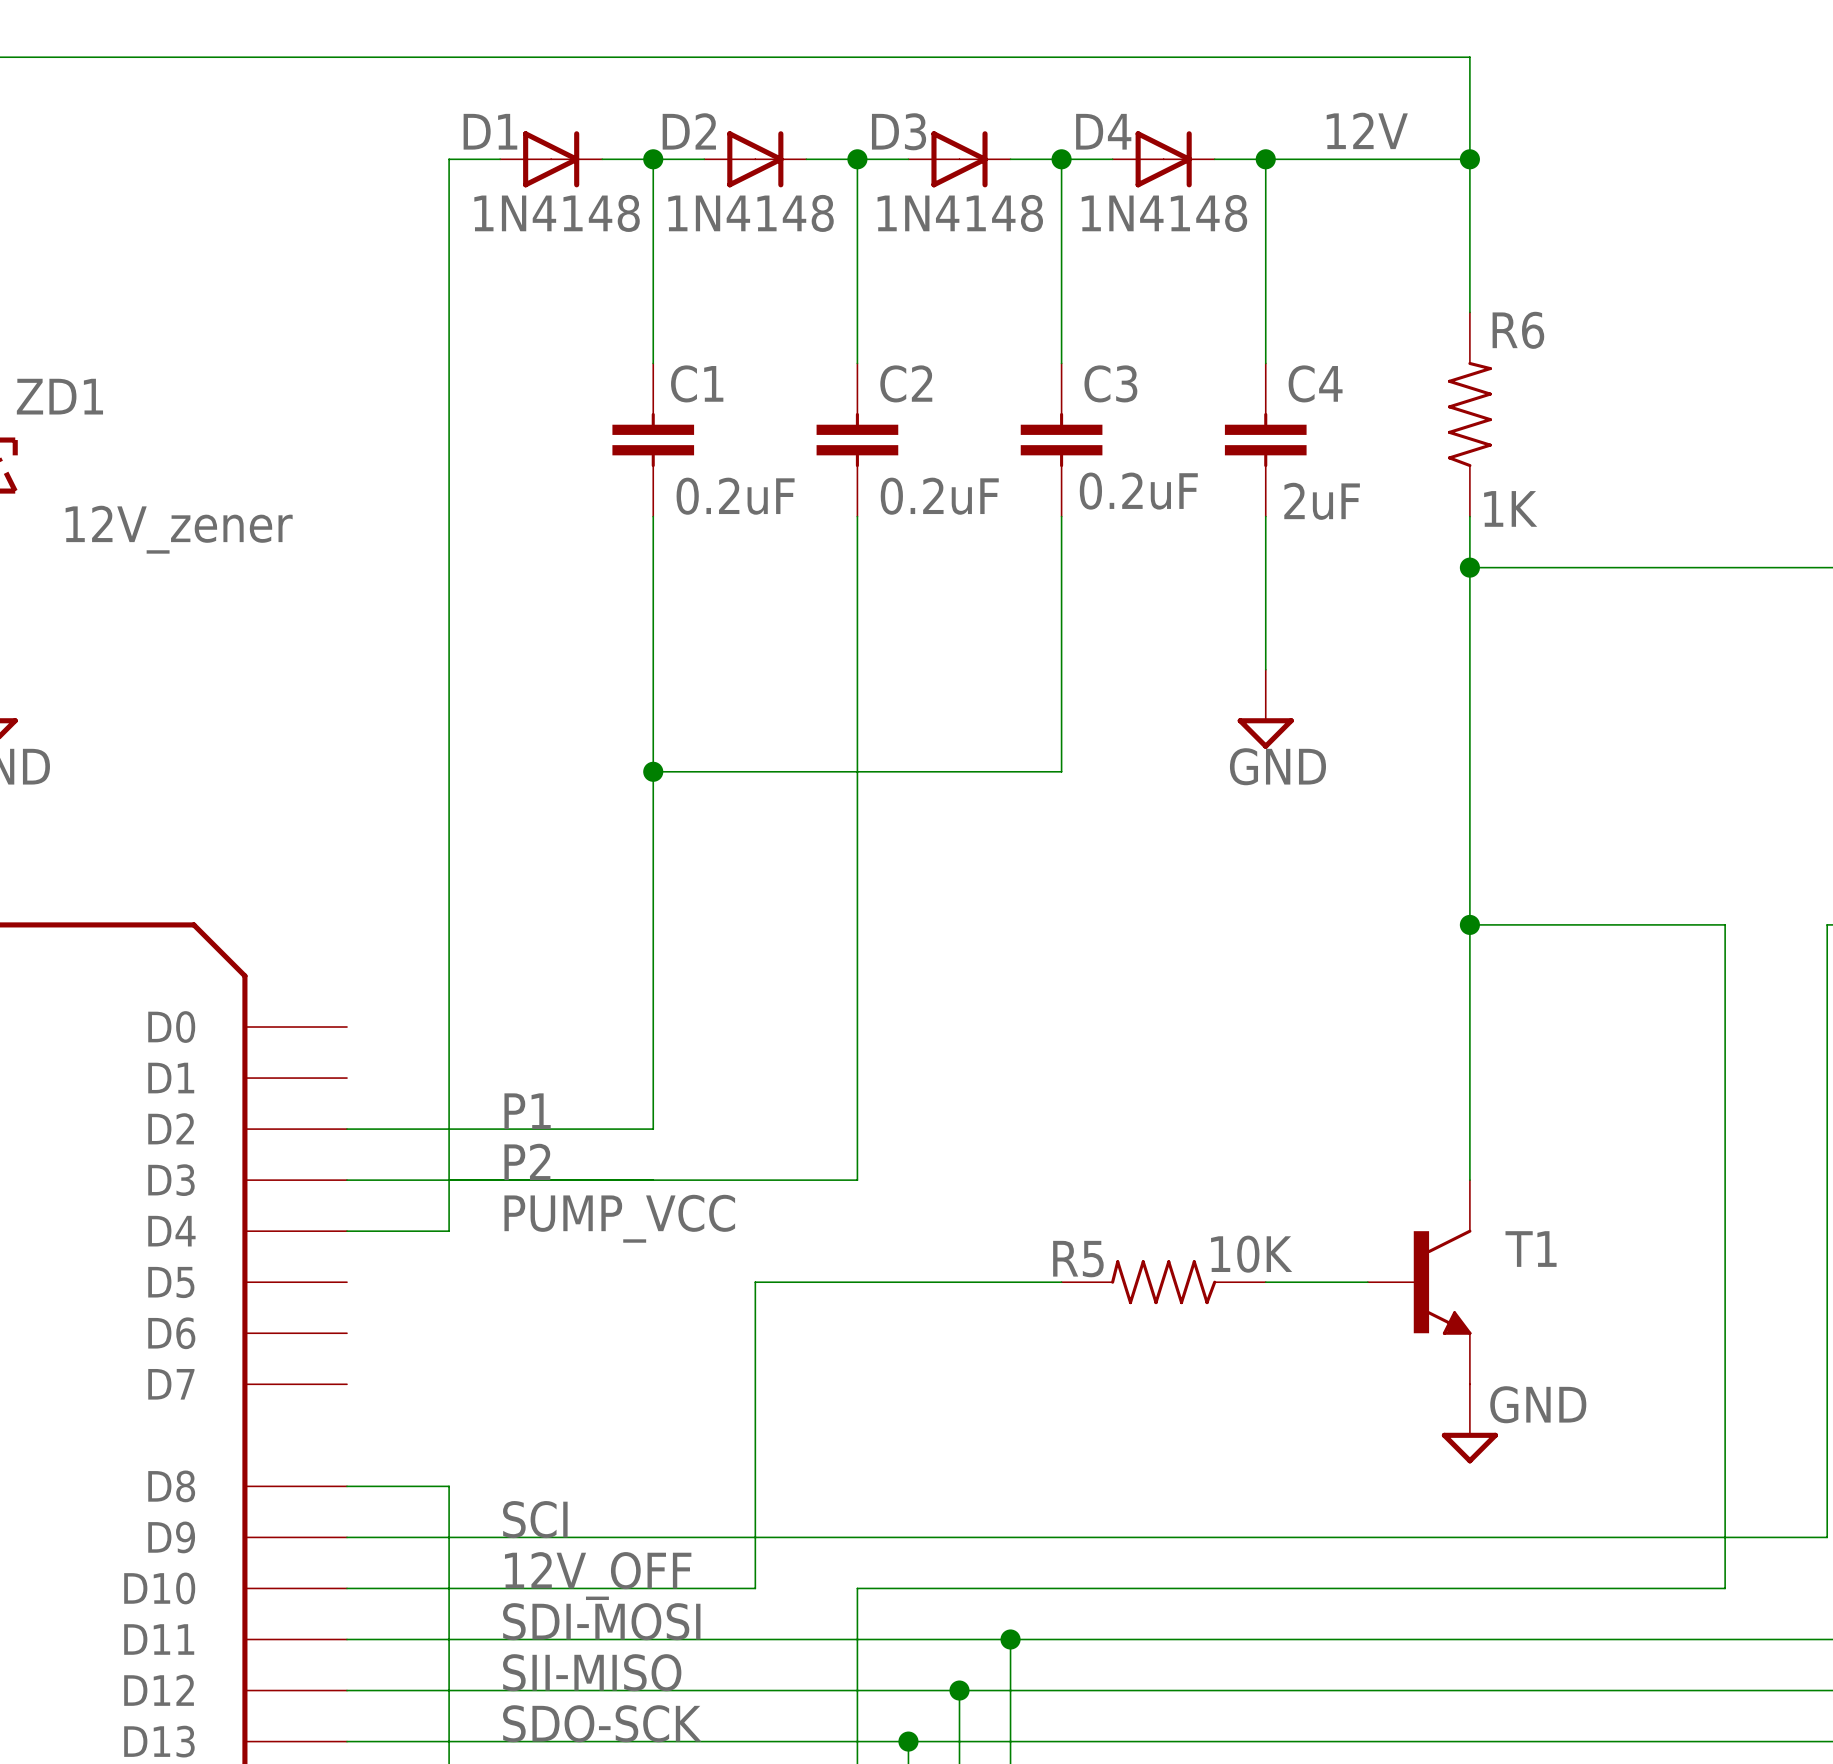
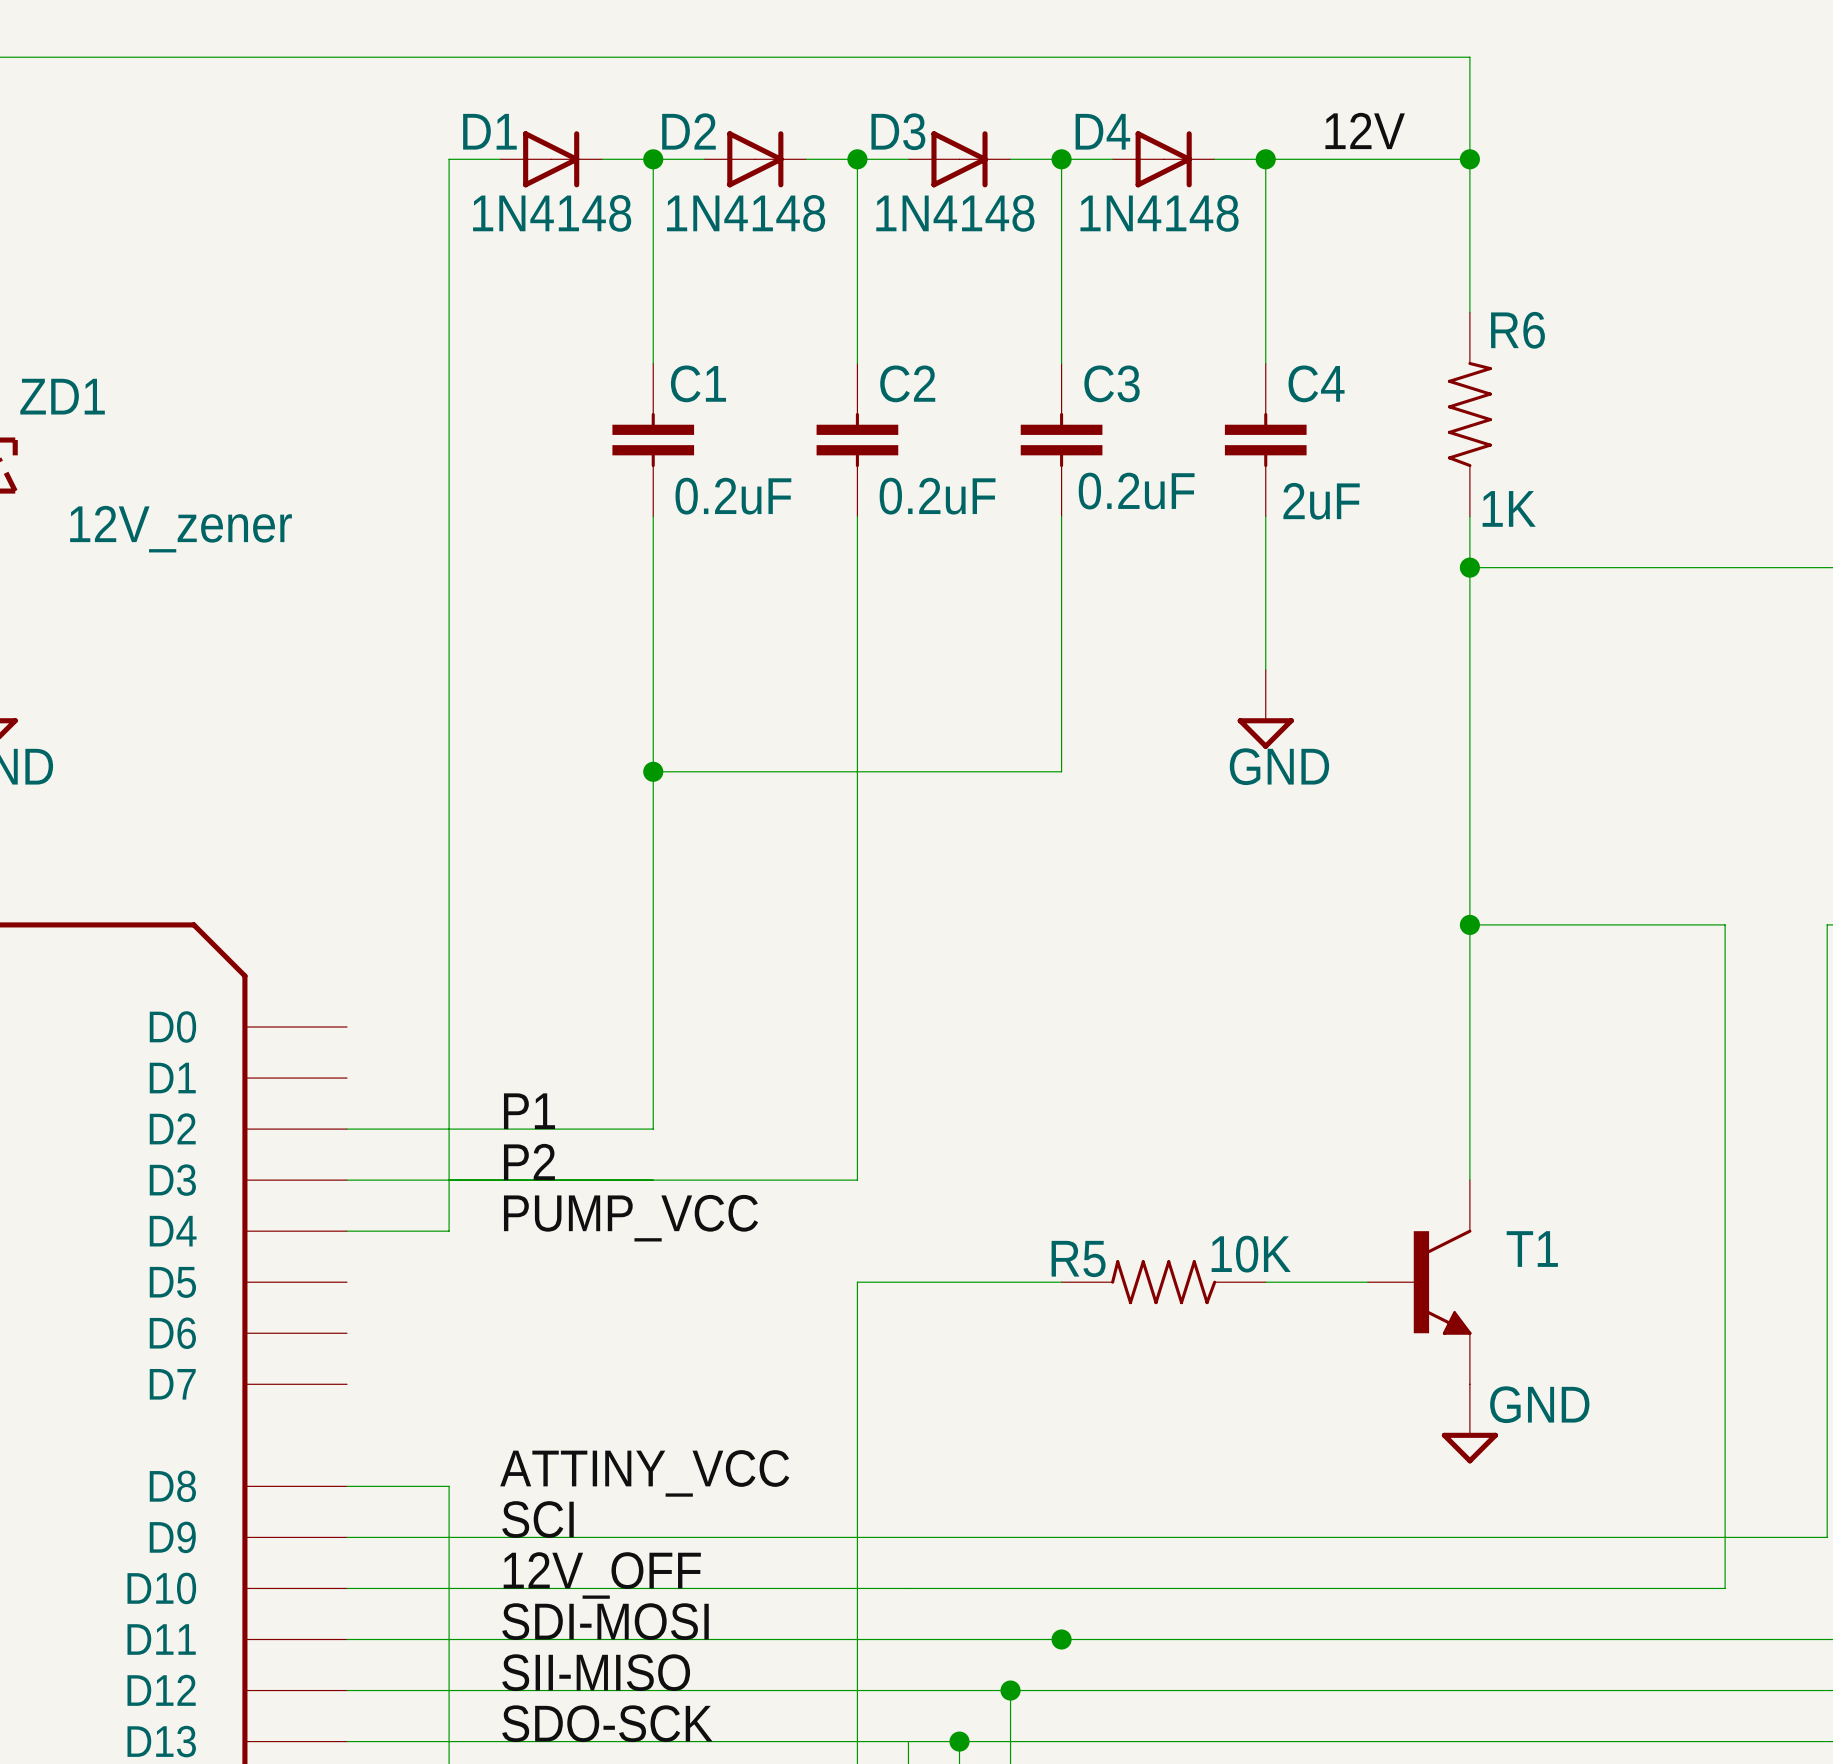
wire: (857, 1282) (755, 1282) (755, 1588) -> (857, 1282) (857, 1588) (755, 1588)
label: none -> ATTINY_VCC (644, 1473)
wire: (1010, 1639) (1010, 1690) -> none
junction: (1010, 1639) -> none
junction: none -> (1061, 1639)
wire: (959, 1690) (959, 1741) -> none
junction: (959, 1690) -> none
junction: none -> (1010, 1690)
junction: (908, 1741) -> none
junction: none -> (959, 1741)

